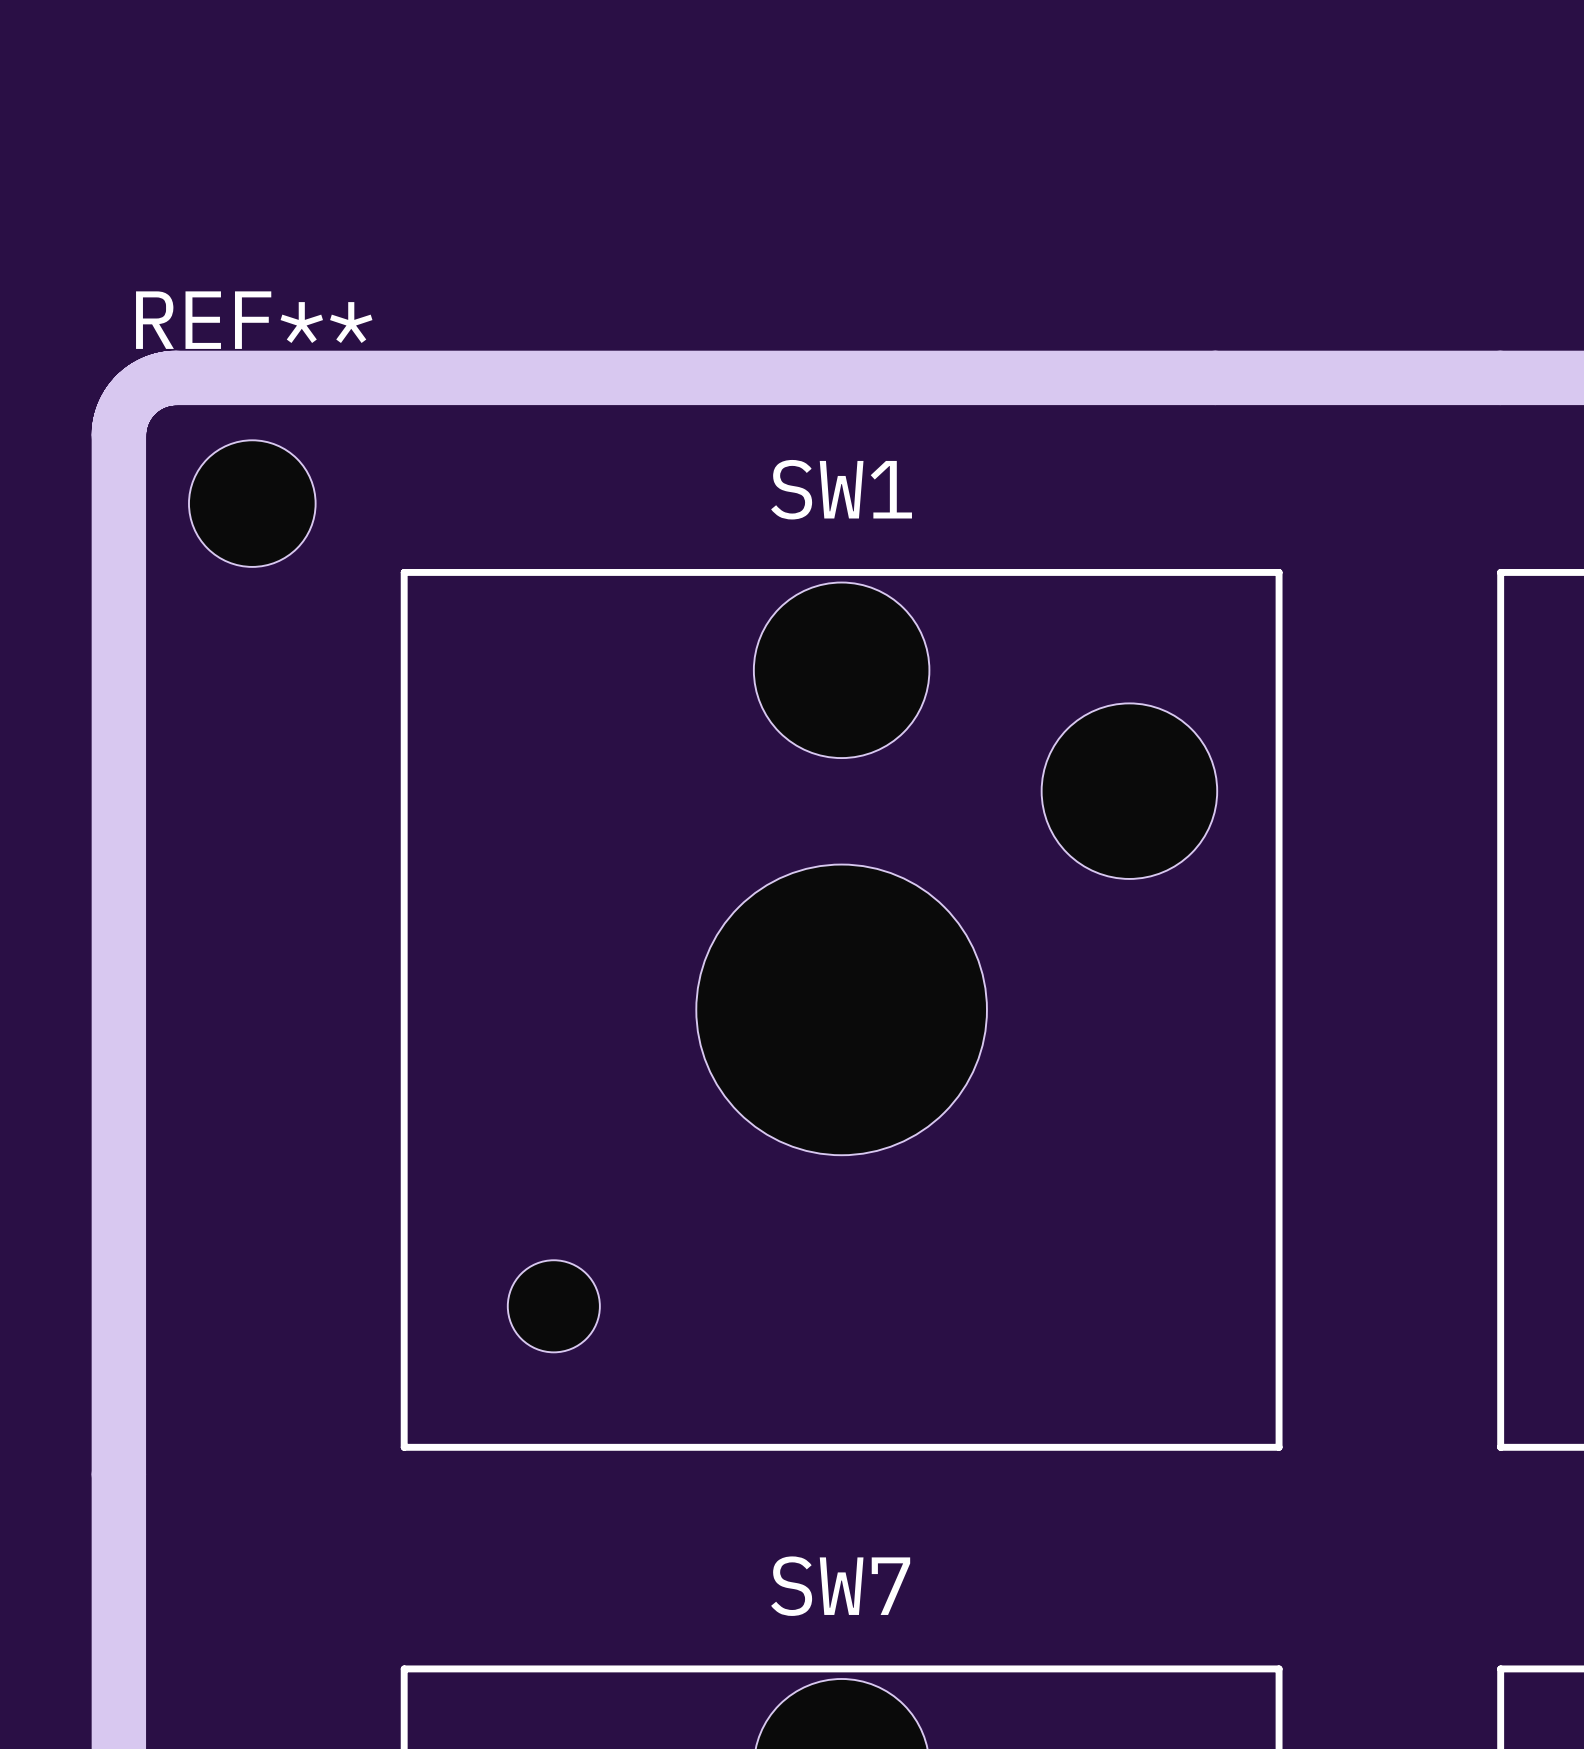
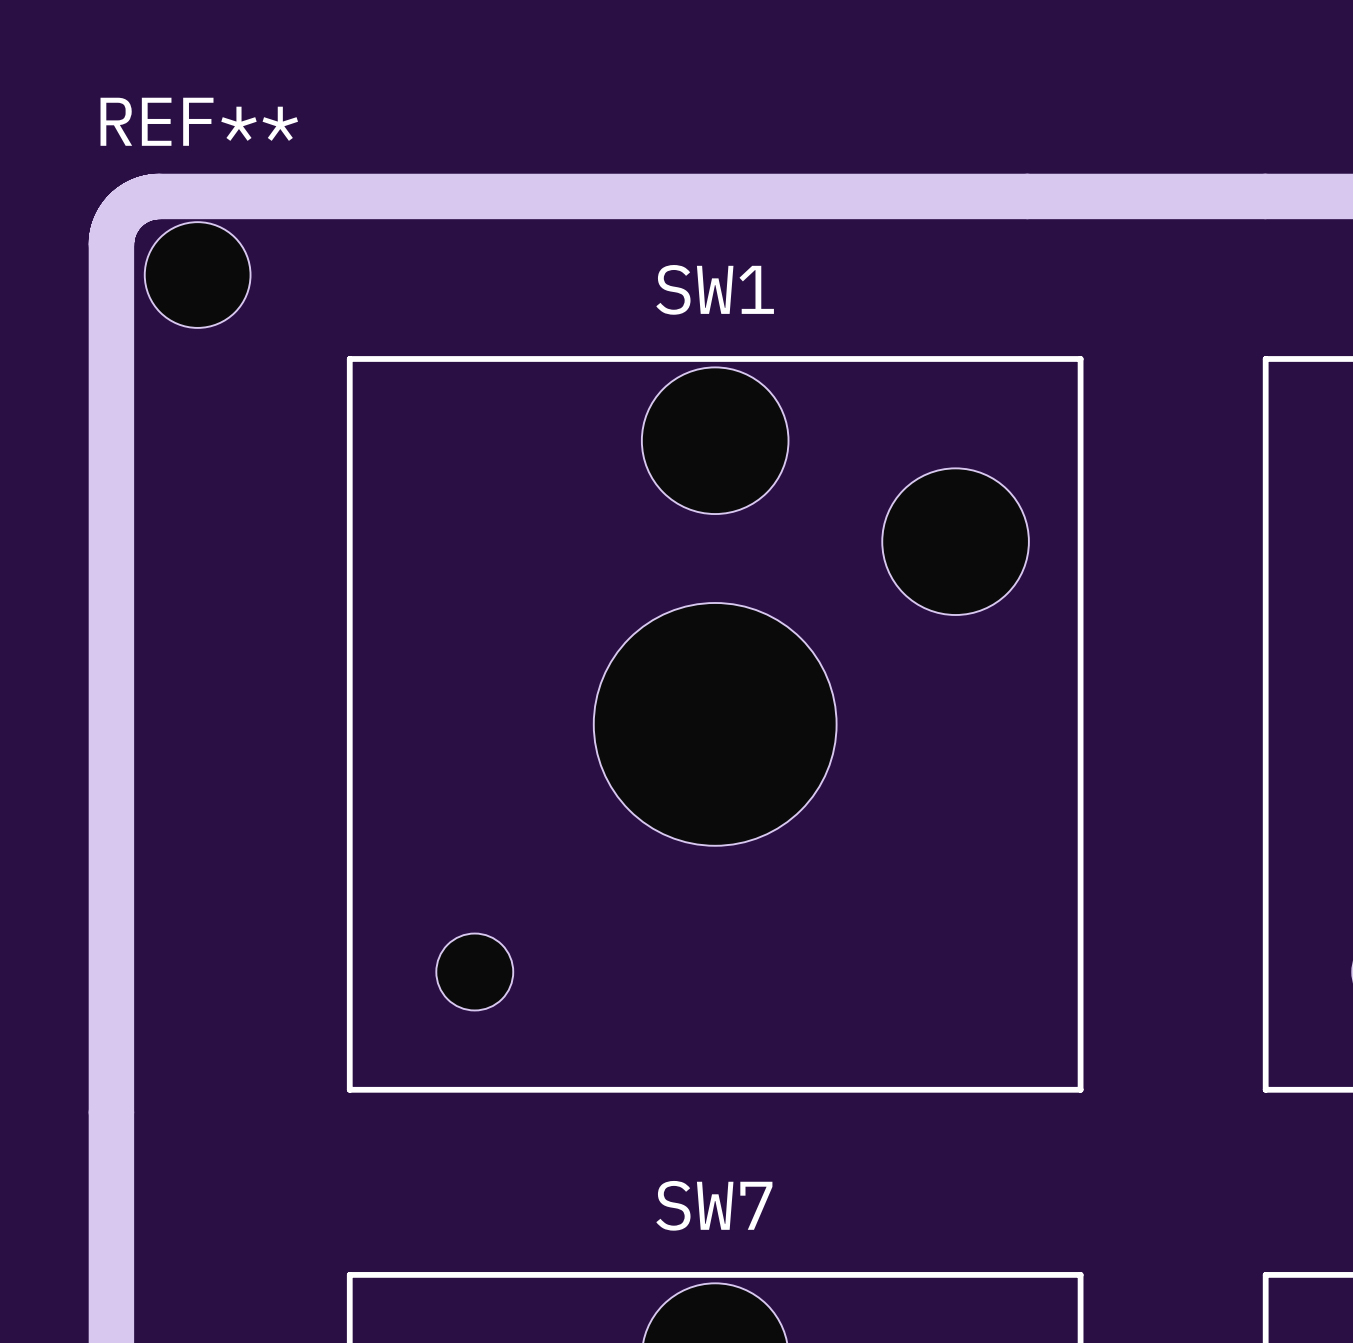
REF** position: (252, 503) -> (197, 275)

